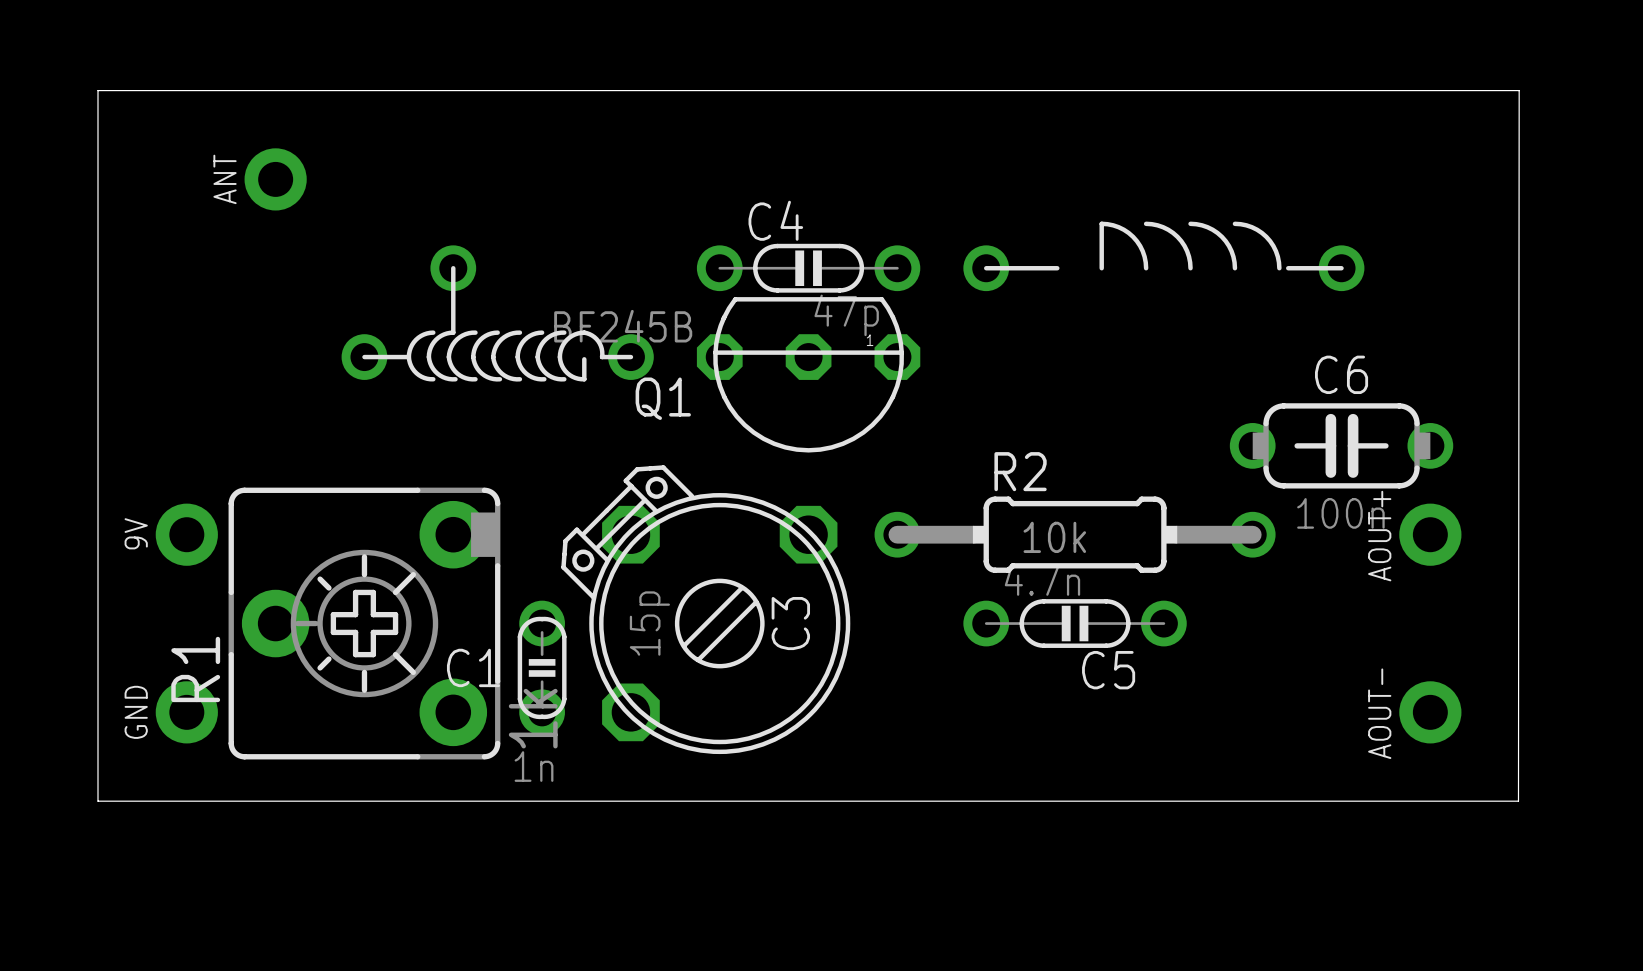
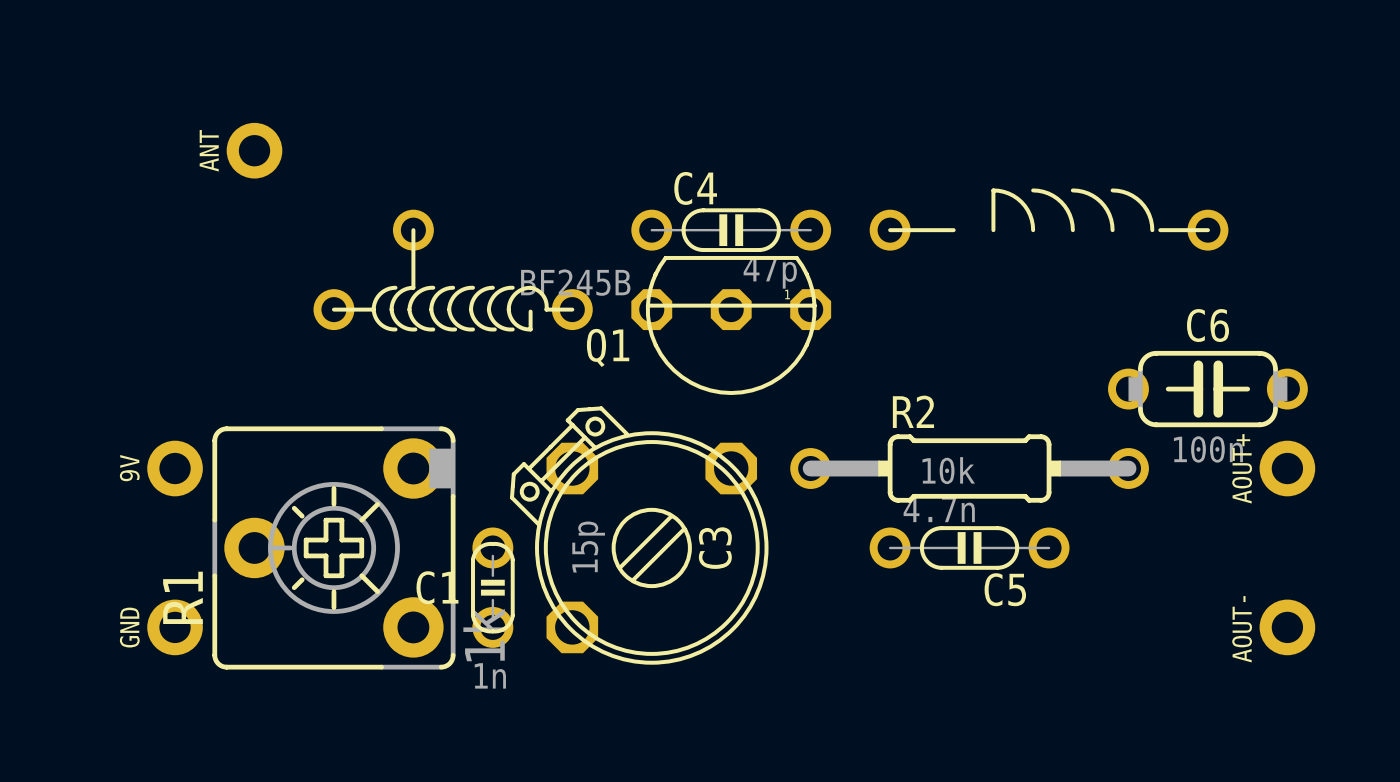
board edge: (98, 90) (1519, 90) (1518, 801) (98, 801) (98, 90) -> none

